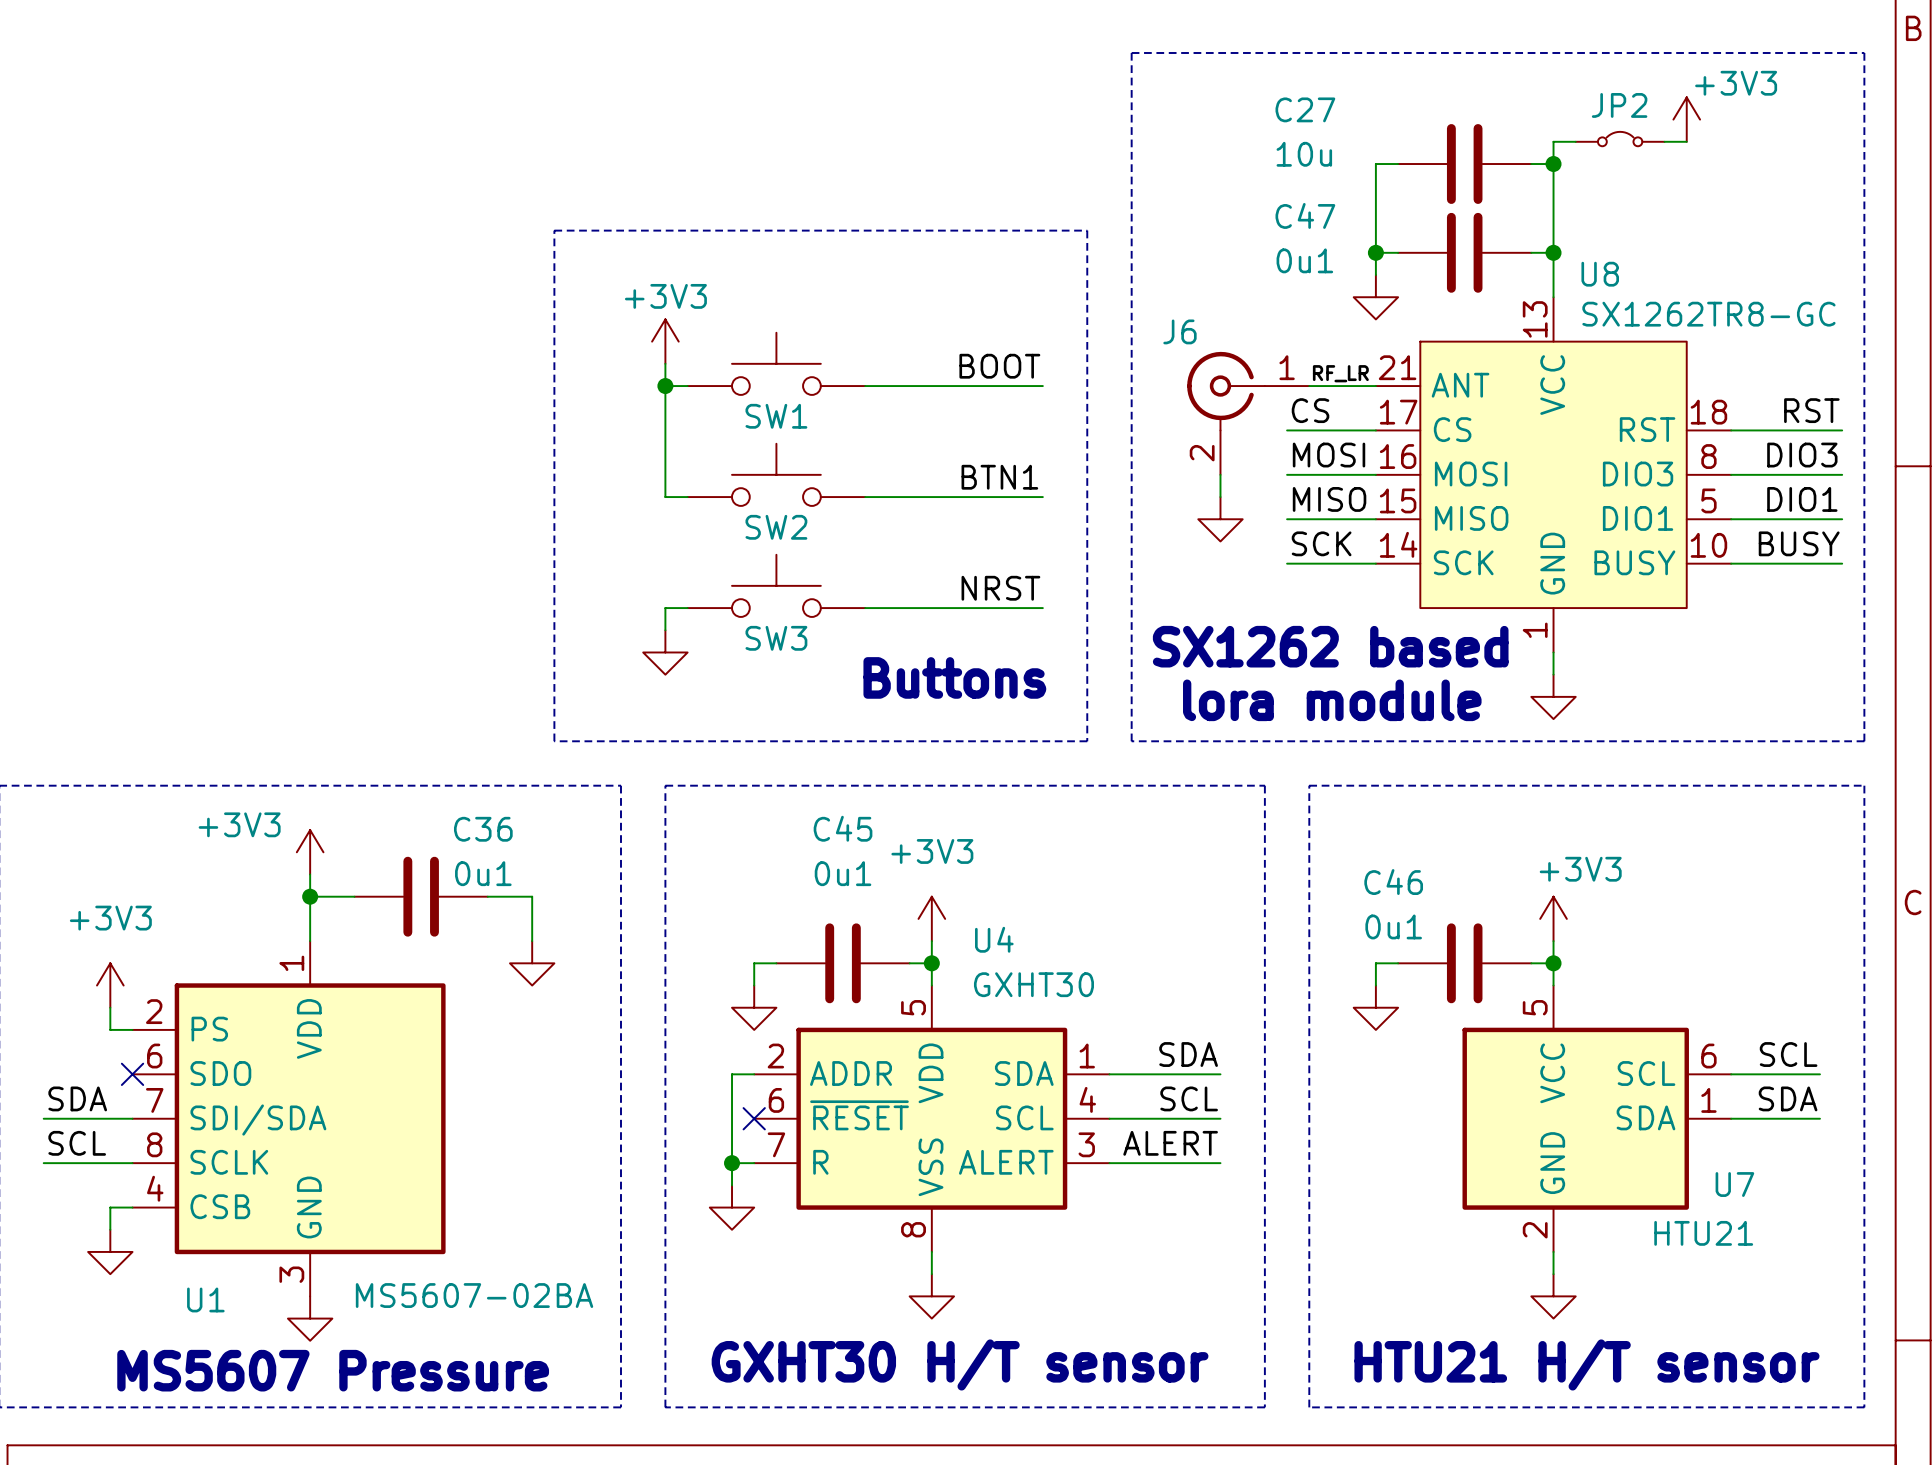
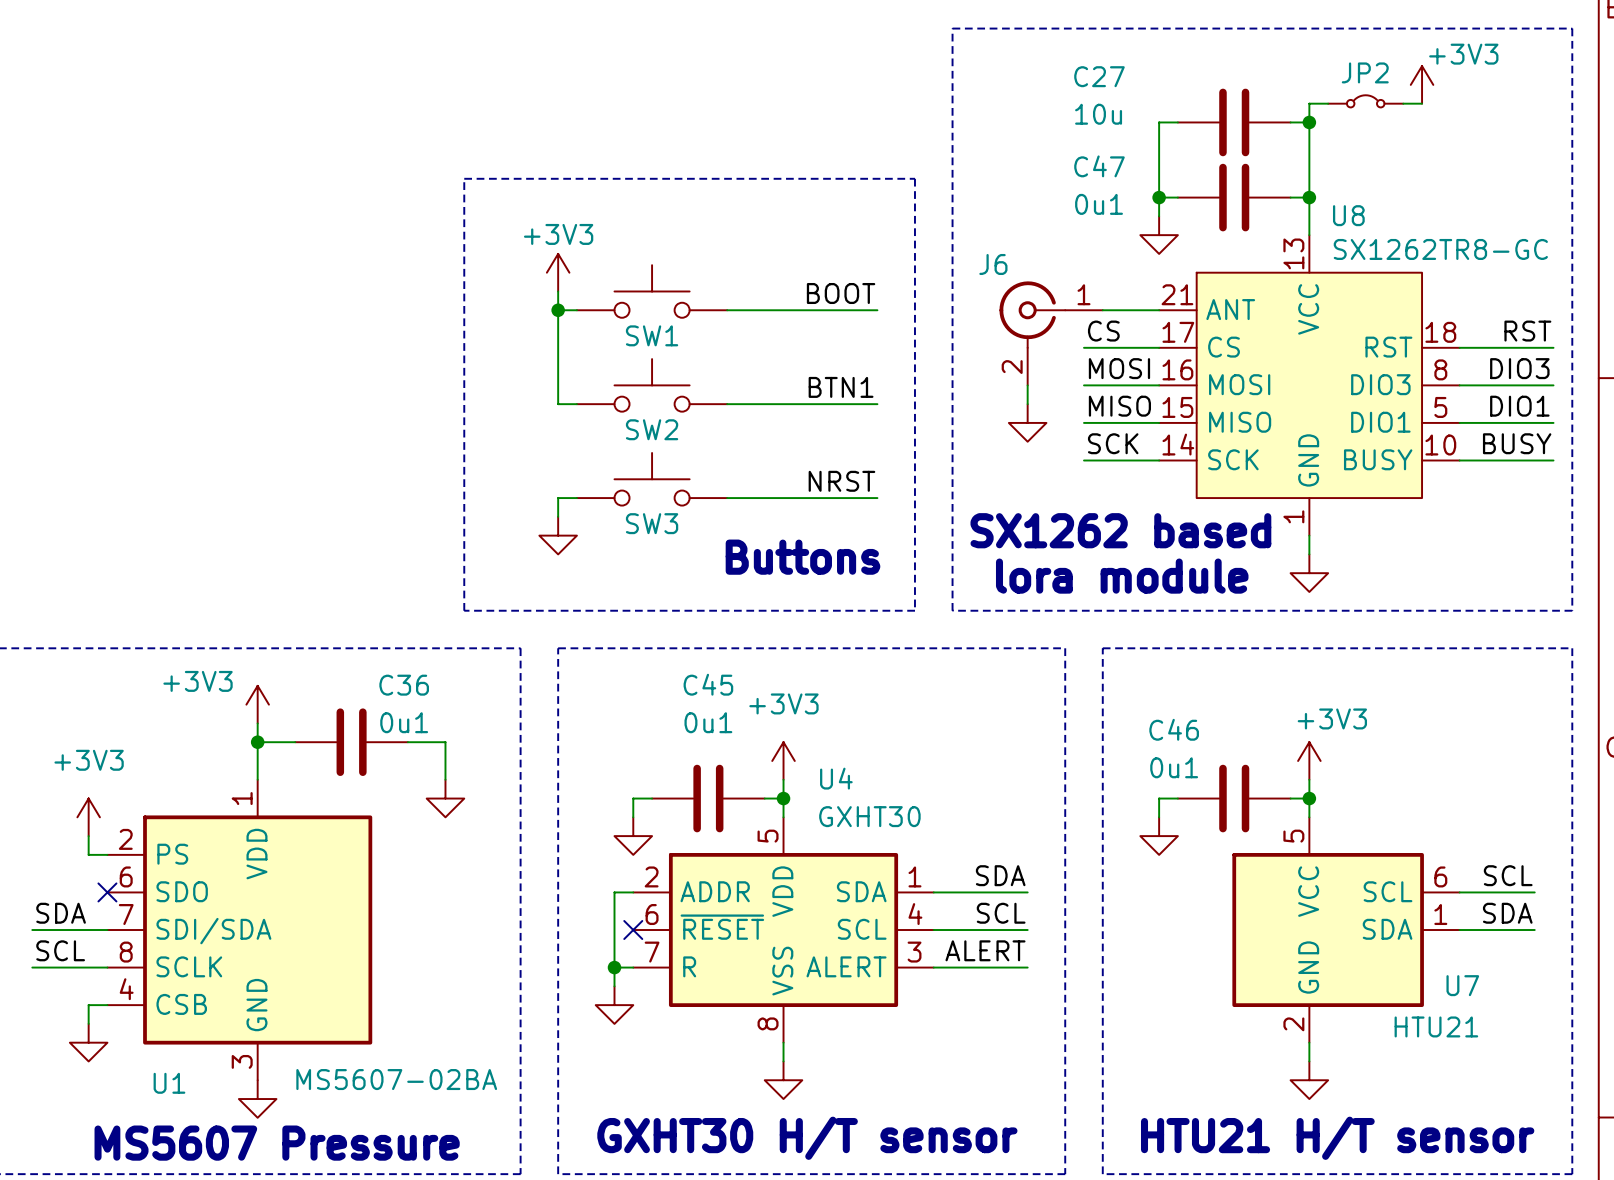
label: RF_LR (1340, 373) -> none

